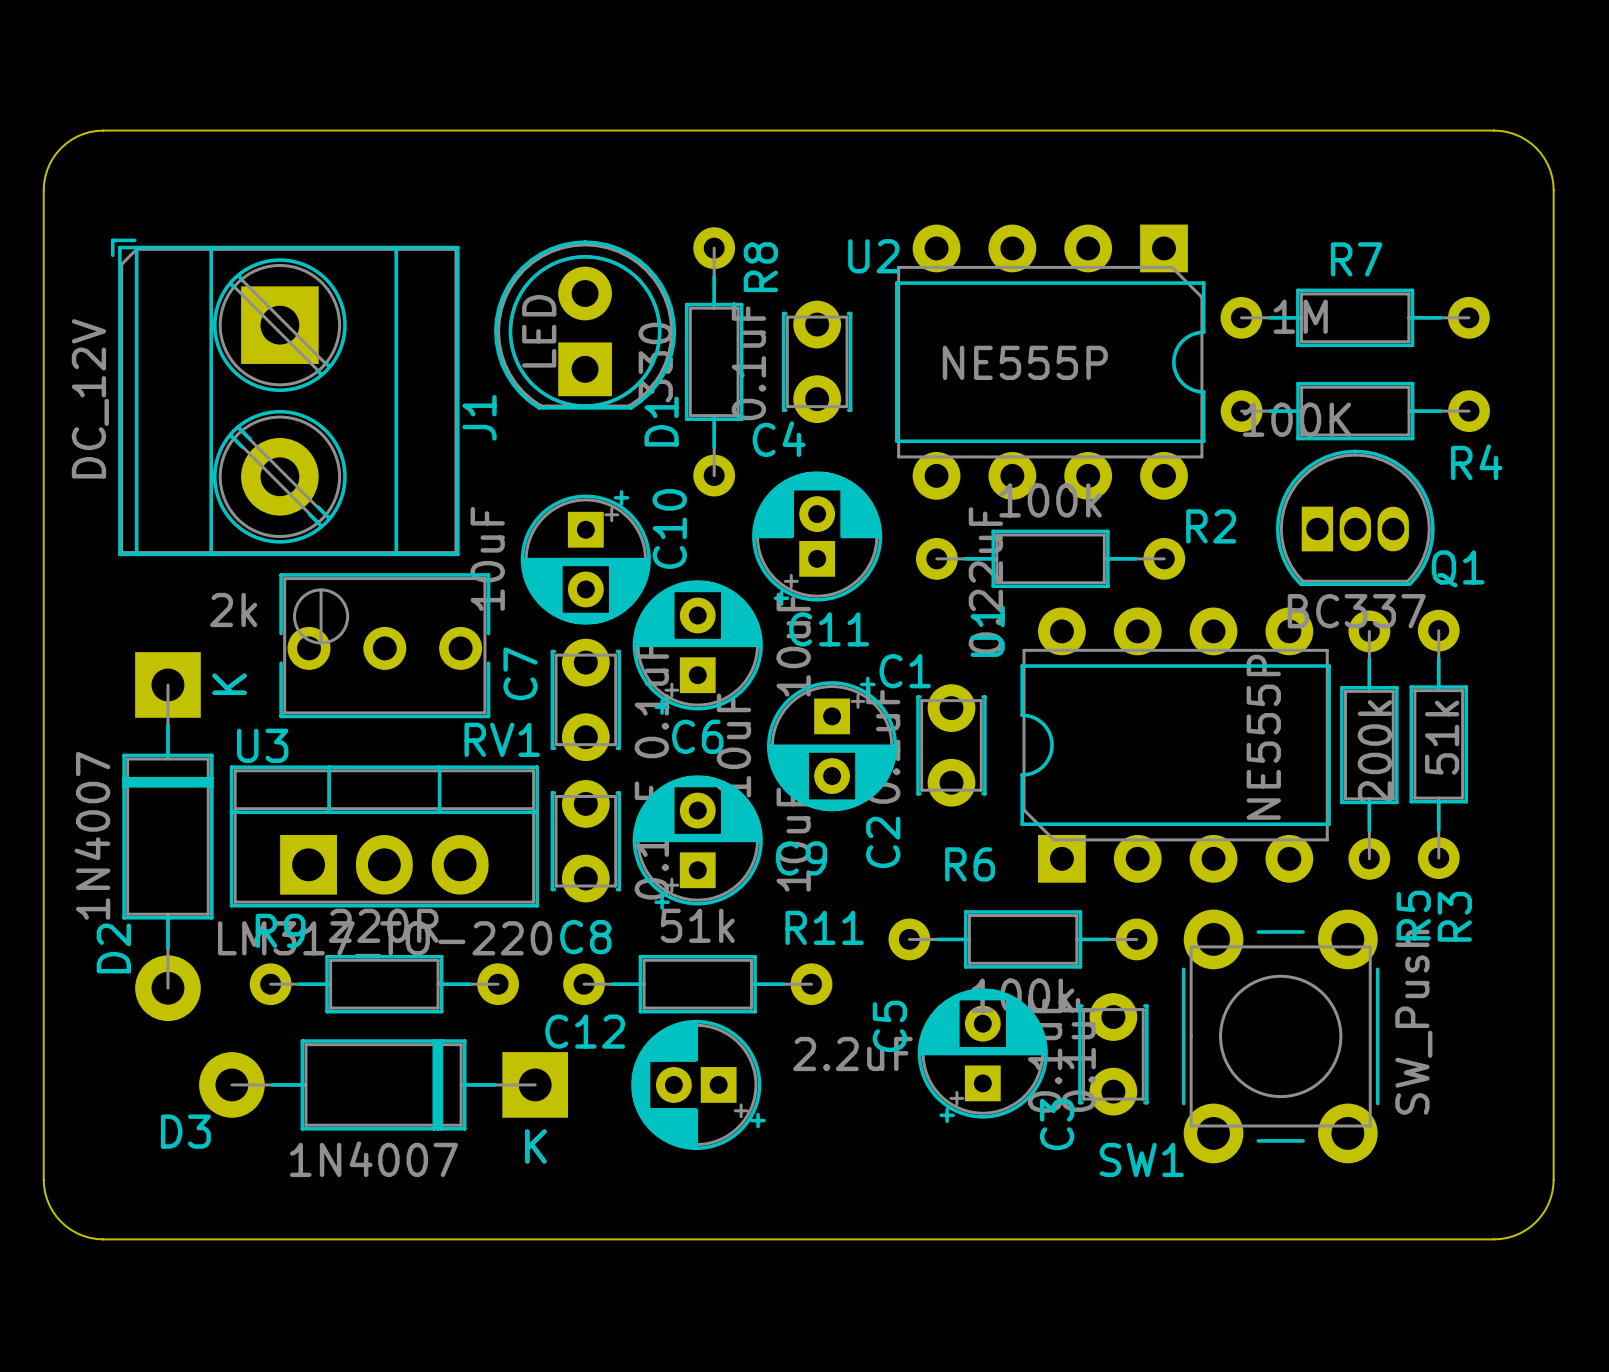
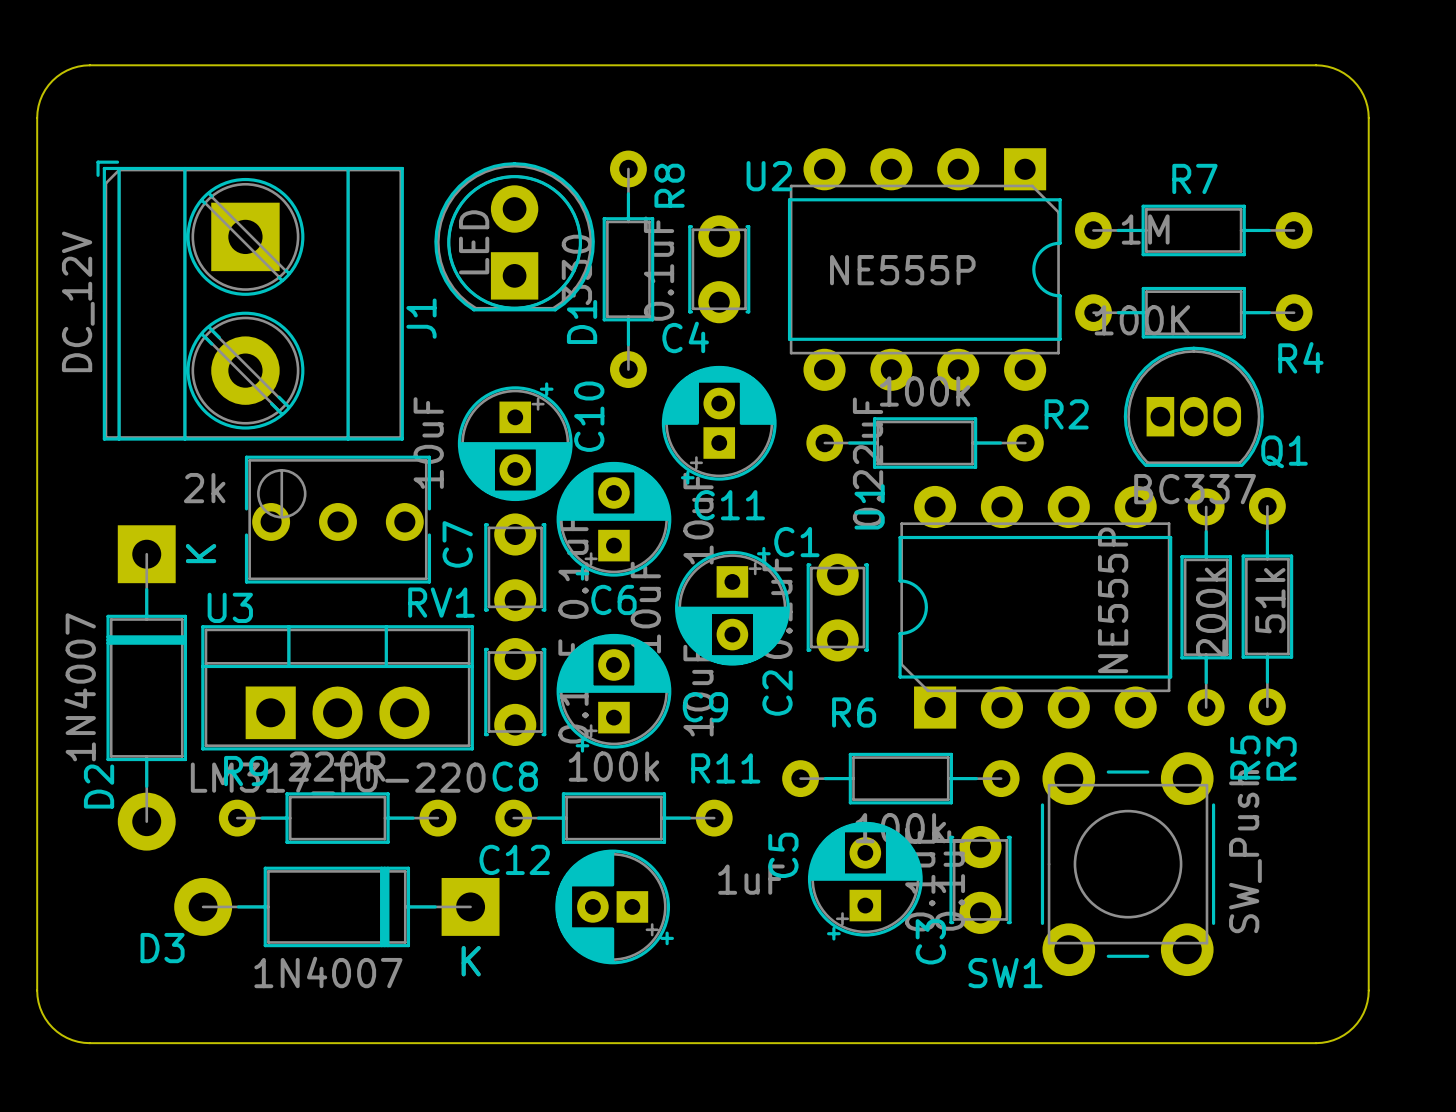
R11 value: 51k (697, 925) -> 100k (613, 766)
C12 value: 2.2uF (852, 1053) -> 1uF (751, 879)

